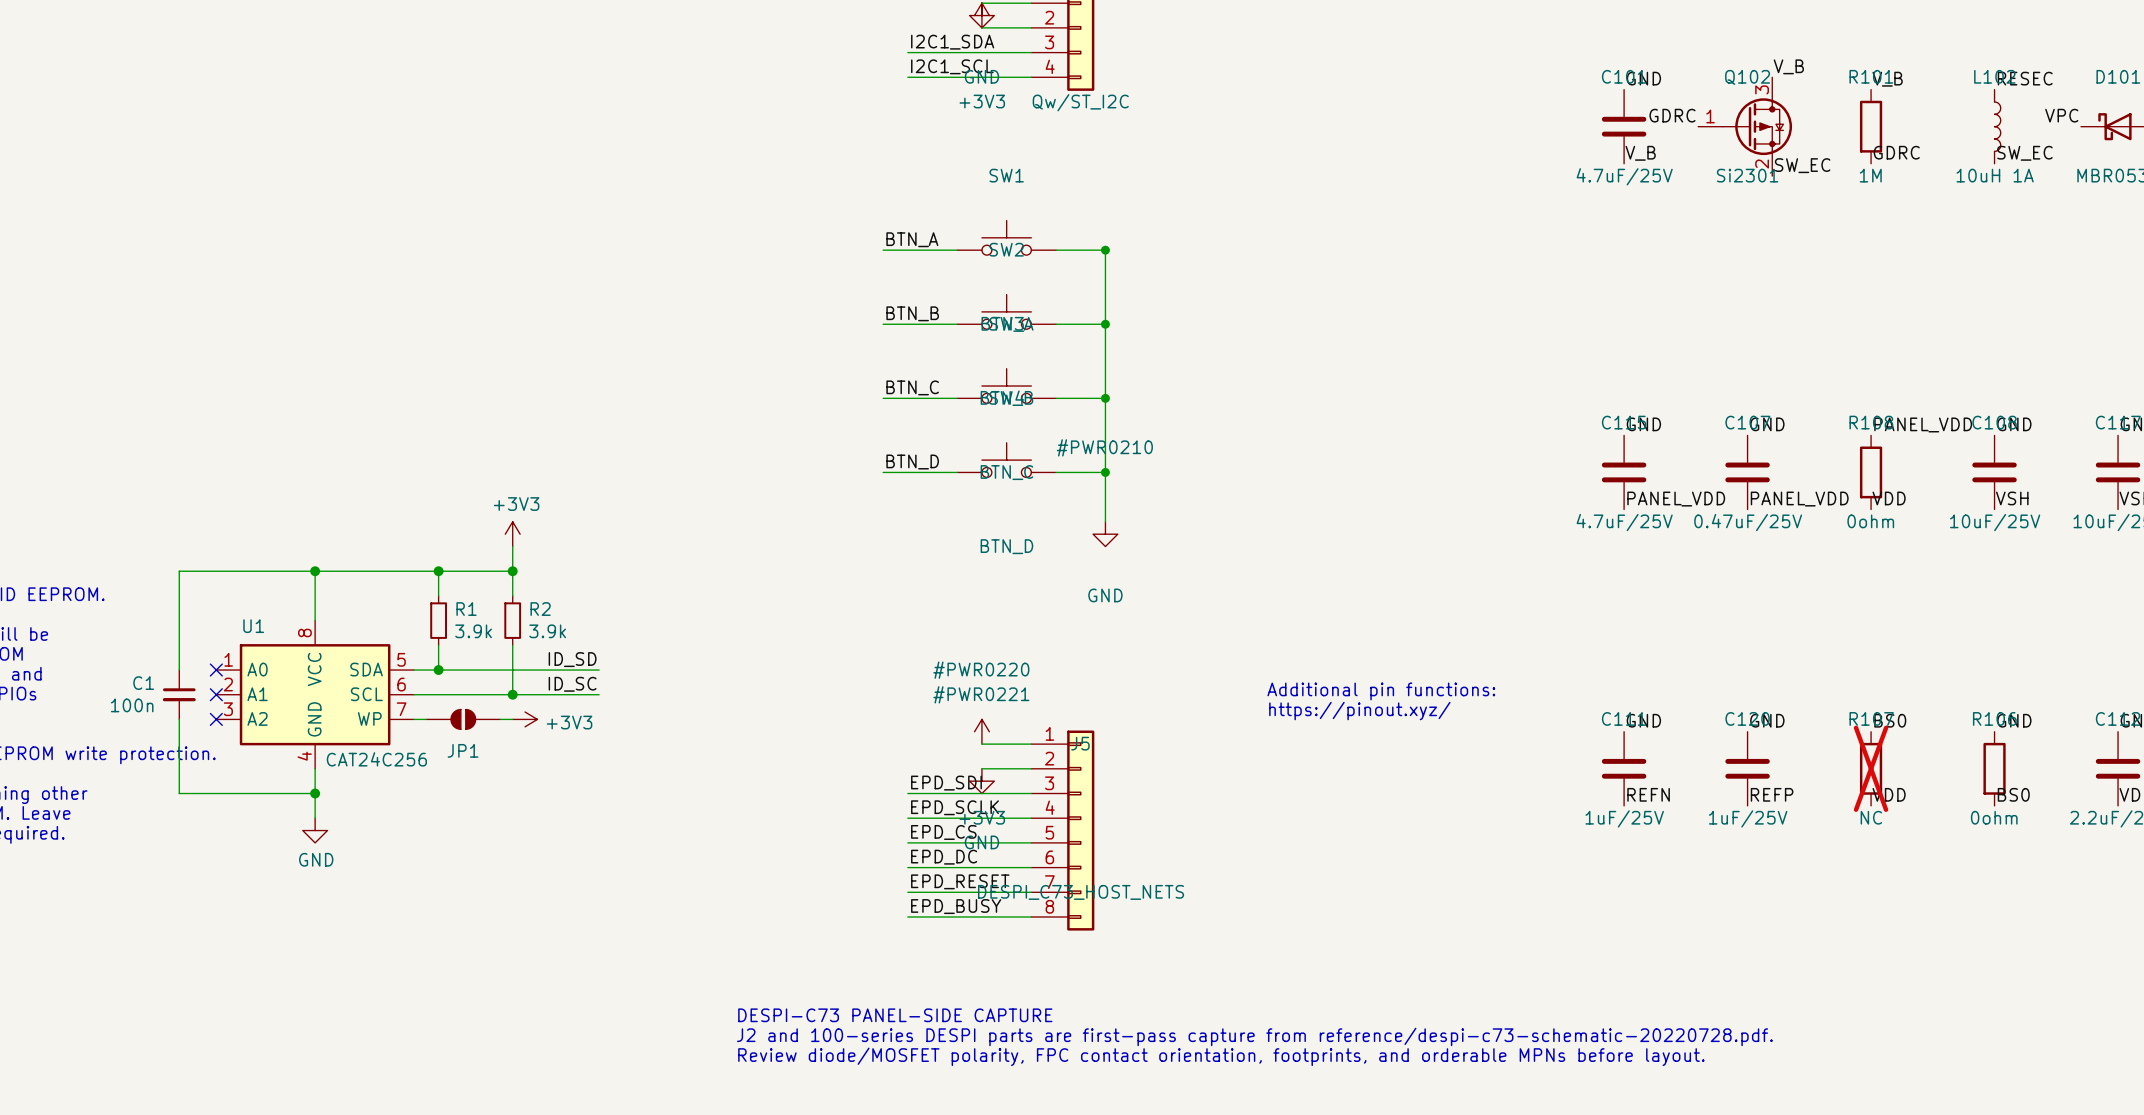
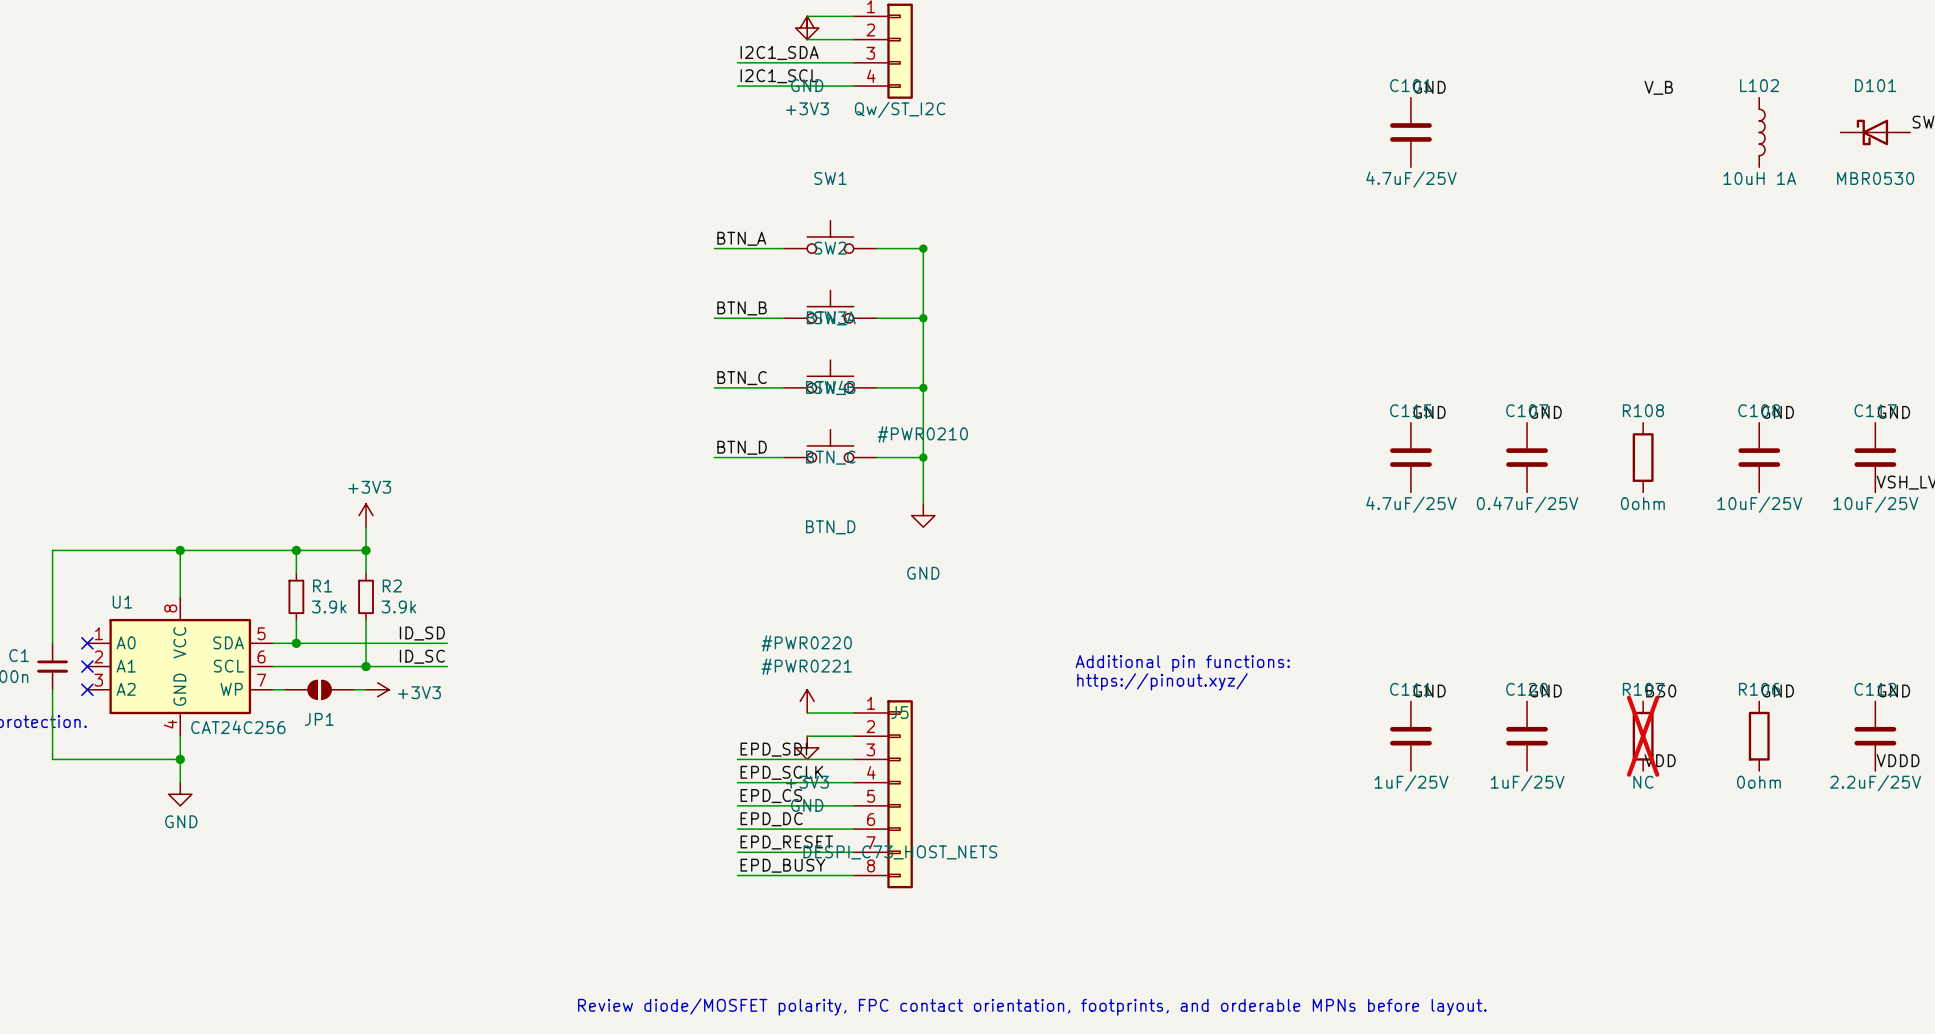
label: V_B (1788, 66) -> none
label: RESEC (2025, 78) -> none
label: GDRC (1672, 115) -> none
label: VPC (2061, 115) -> none
Q102: Si2301 (1745, 126) -> none
R101: 1M (1871, 126) -> none
label: GDRC (1896, 152) -> none
label: V_B (1640, 153) -> none
label: SW_EC (2024, 153) -> none
label: SW_EC (1802, 165) -> none
label: PANEL_VDD (1923, 424) -> none
label: VDD (1889, 498) -> none
label: VSH (2012, 498) -> none
label: PANEL_VDD (1676, 499) -> none
label: PANEL_VDD (1799, 499) -> none
label: REFN (1648, 794) -> none
label: REFP (1772, 794) -> none
label: BS0 (2013, 794) -> none
text: DESPI-C73 PANEL-SIDE CAPTURE (895, 1015) -> none
text: J2 and 100-series DESPI parts are first-pass capture from reference/despi-c73-schematic-20220728.pdf. (1254, 1036) -> none

